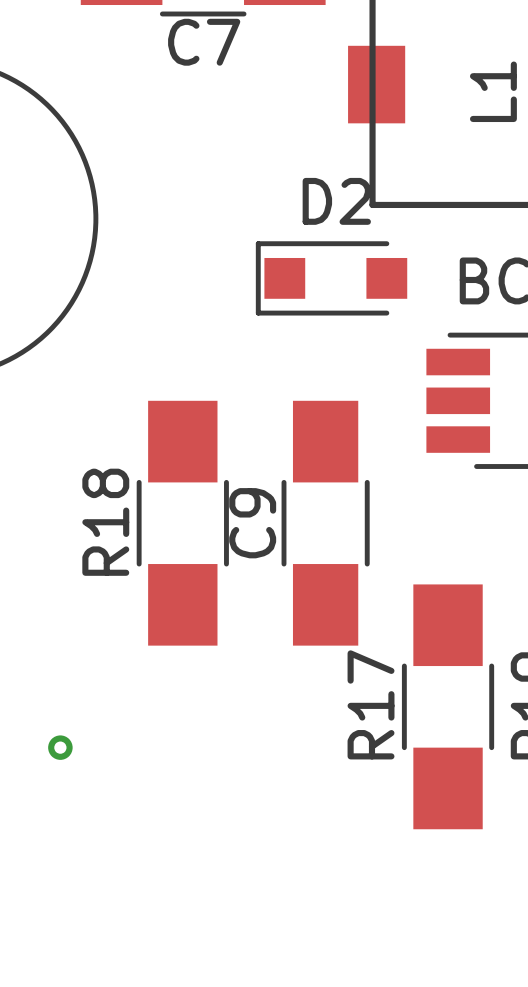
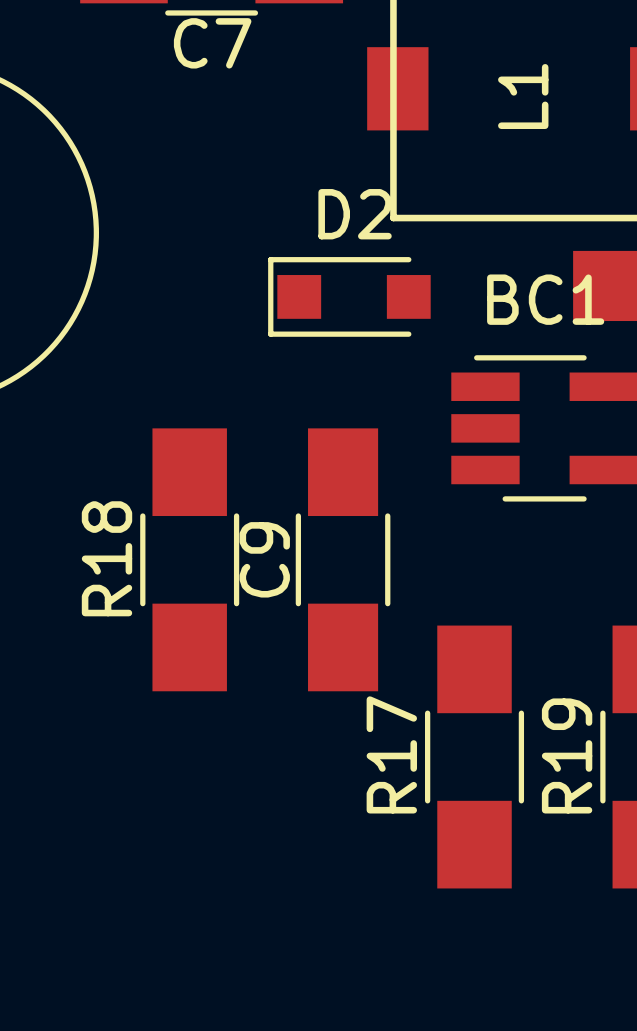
part: (60, 747) -> none

